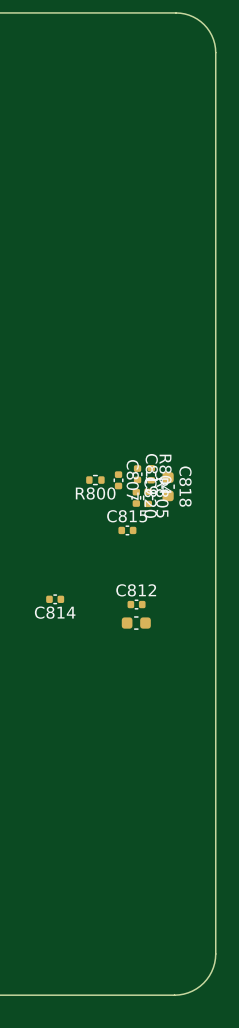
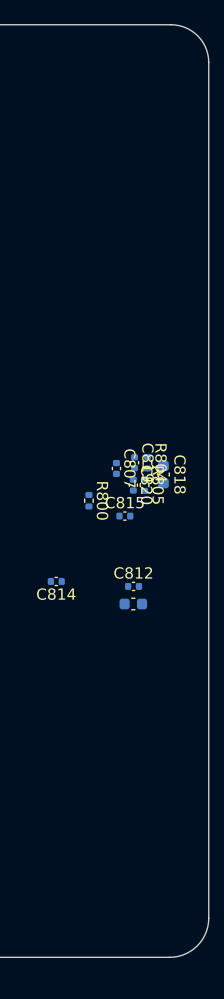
R800 rotation: 0° (95, 480) -> 90° clockwise (88, 500)
R800 position: (95, 480) -> (88, 500)

